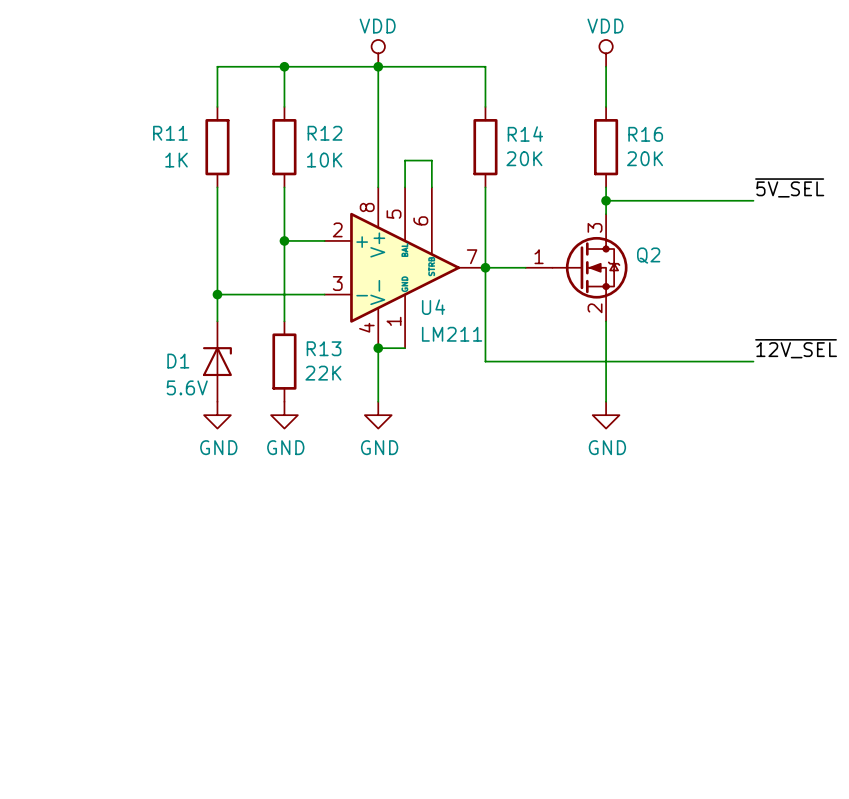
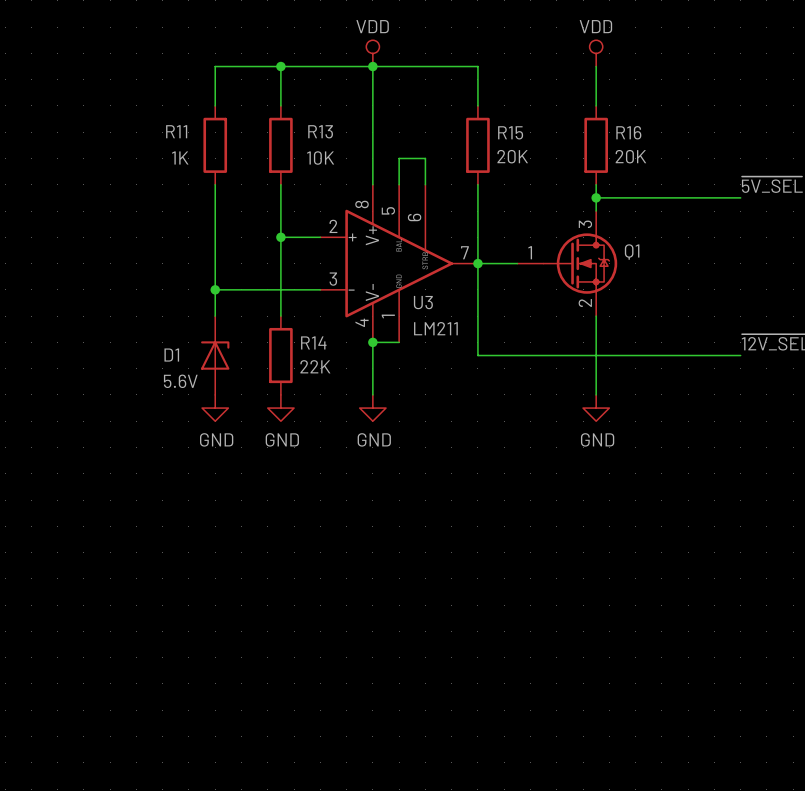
R12 name: R12 (324, 133) -> R13 (320, 131)
R14 name: R14 (525, 134) -> R15 (510, 132)
Q2 name: Q2 (648, 255) -> Q1 (632, 252)
U4 name: U4 (433, 307) -> U3 (423, 302)
R13 name: R13 (324, 348) -> R14 (313, 342)

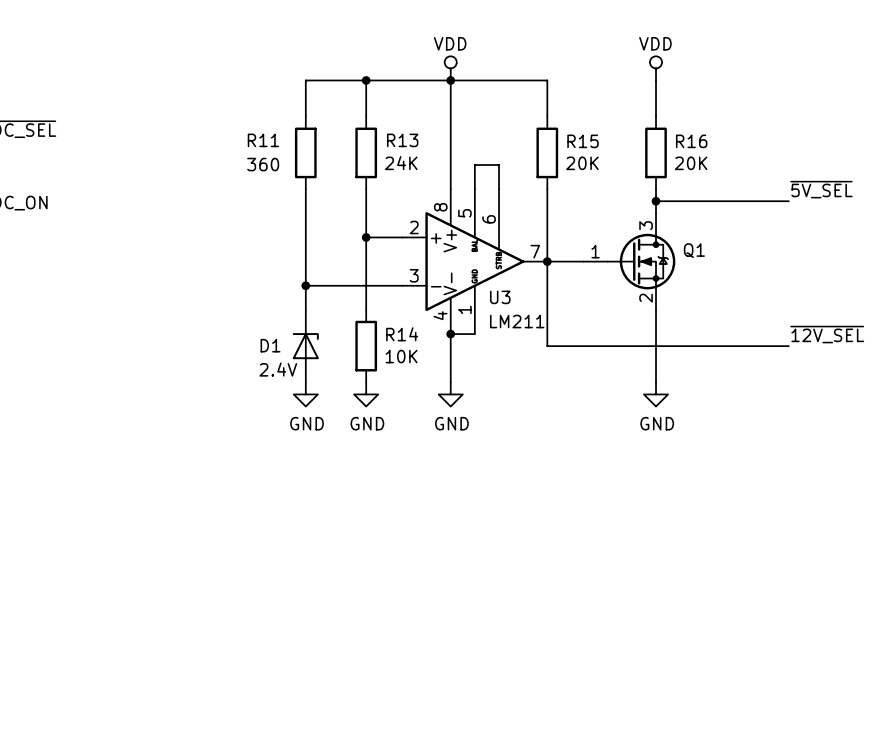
R11 value: 1K (180, 157) -> 360 (263, 164)
R13 value: 10K (320, 158) -> 24K (401, 163)
R14 value: 22K (315, 366) -> 10K (401, 356)
D1 value: 5.6V (180, 381) -> 2.4V (278, 369)

